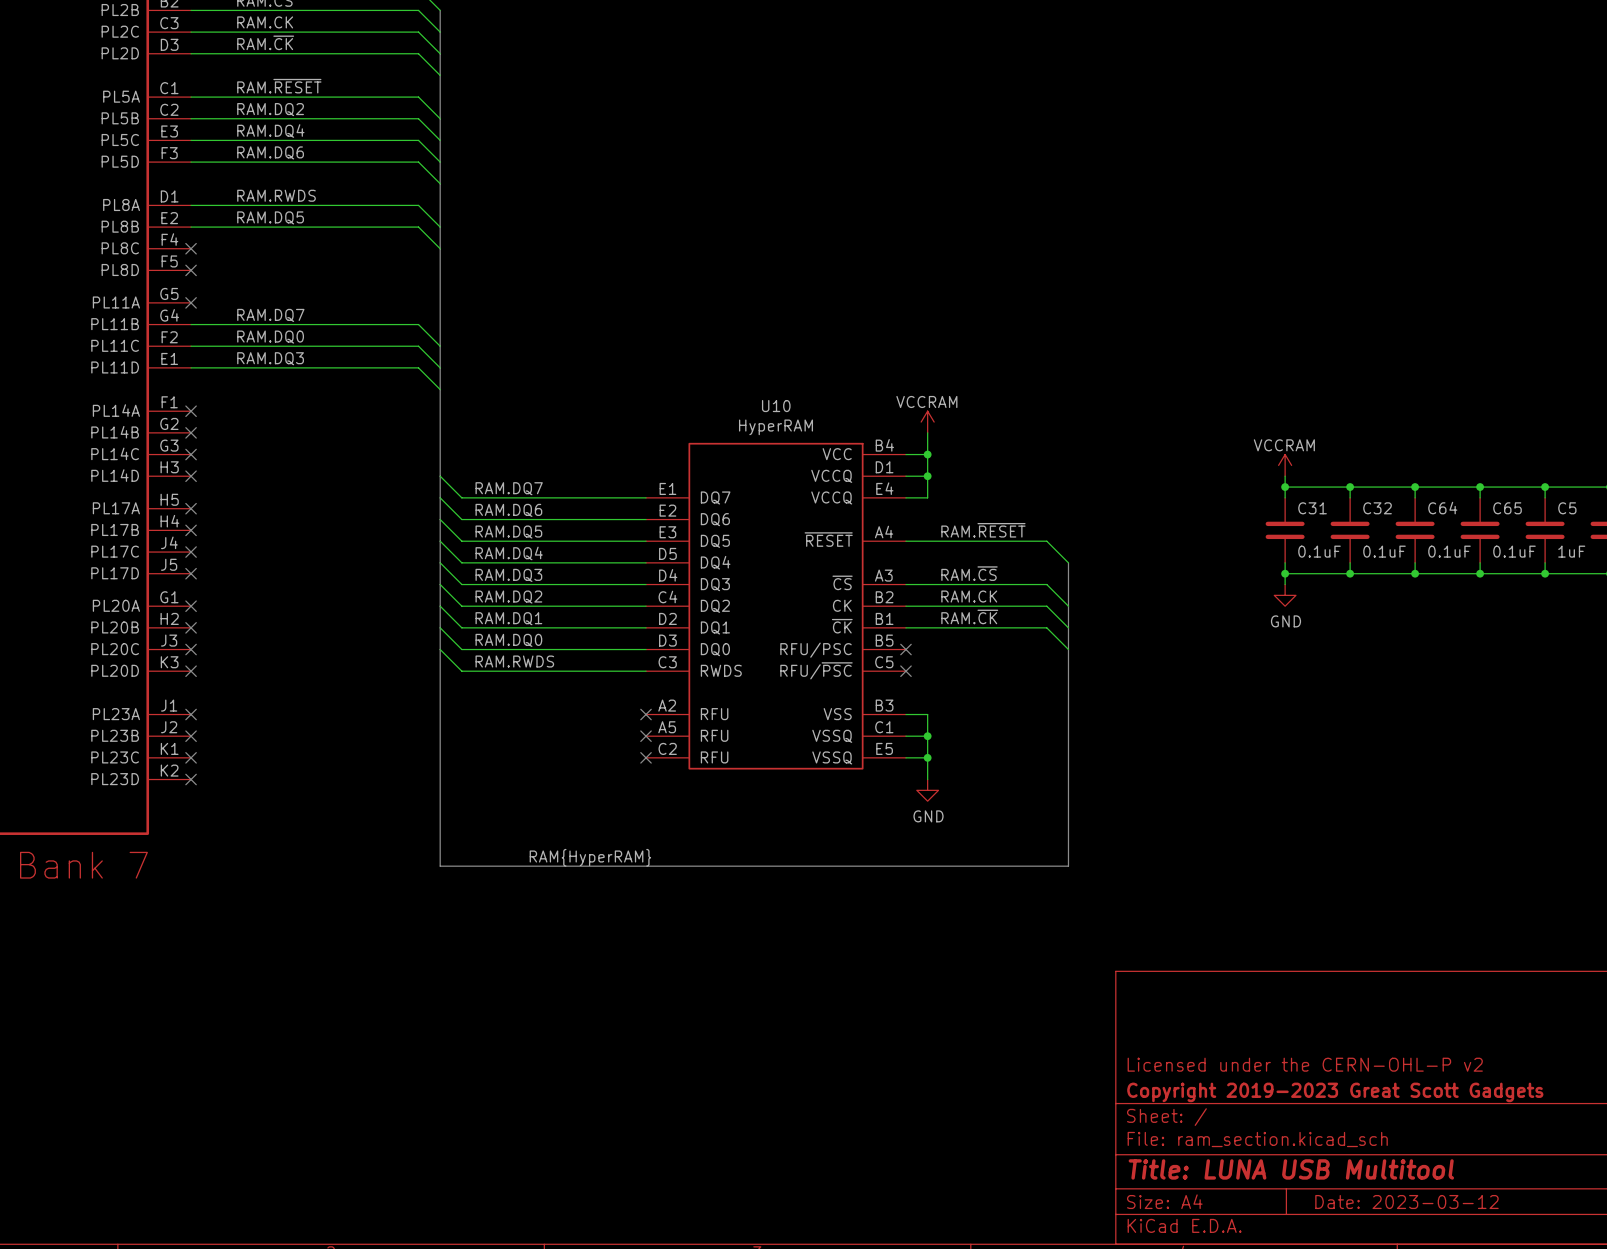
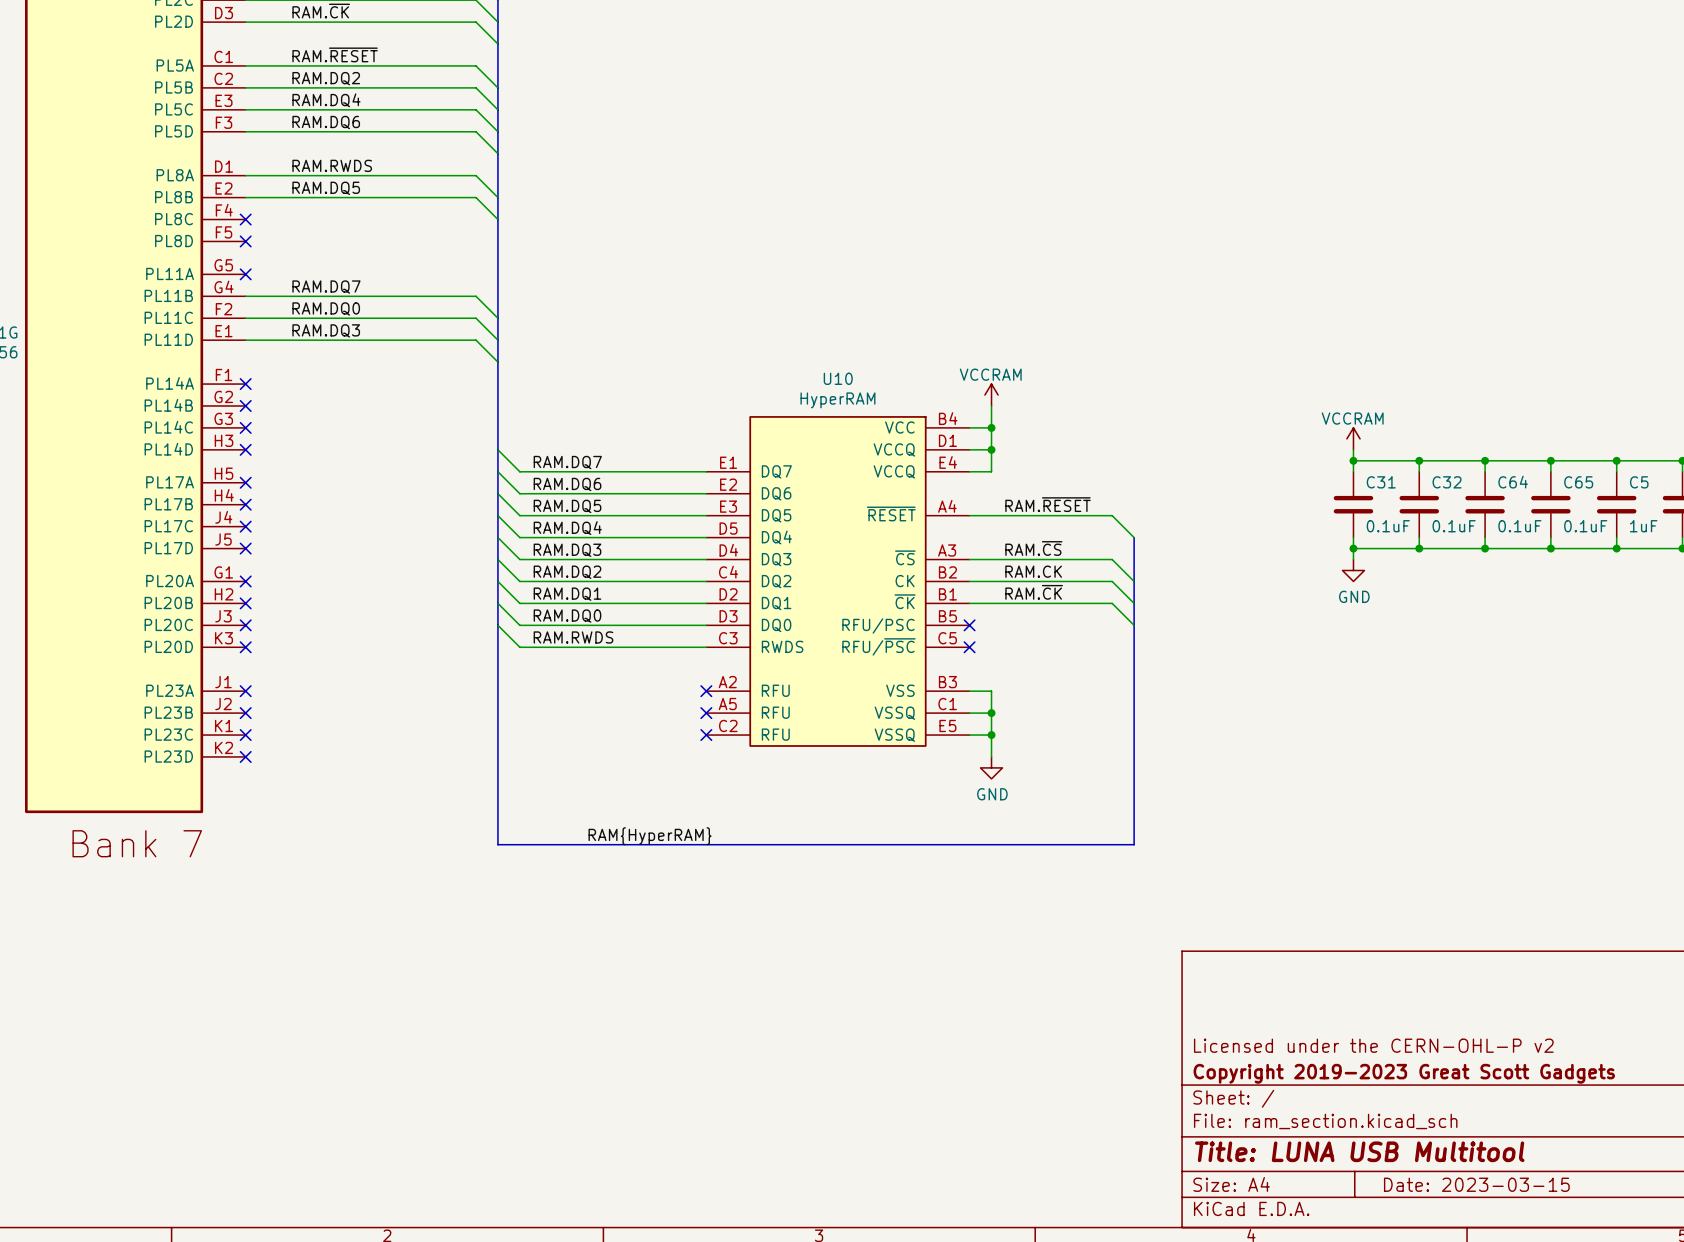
title block: Date: 2023-03-12 (1406, 1202) -> Date: 2023-03-15 (1476, 1184)

